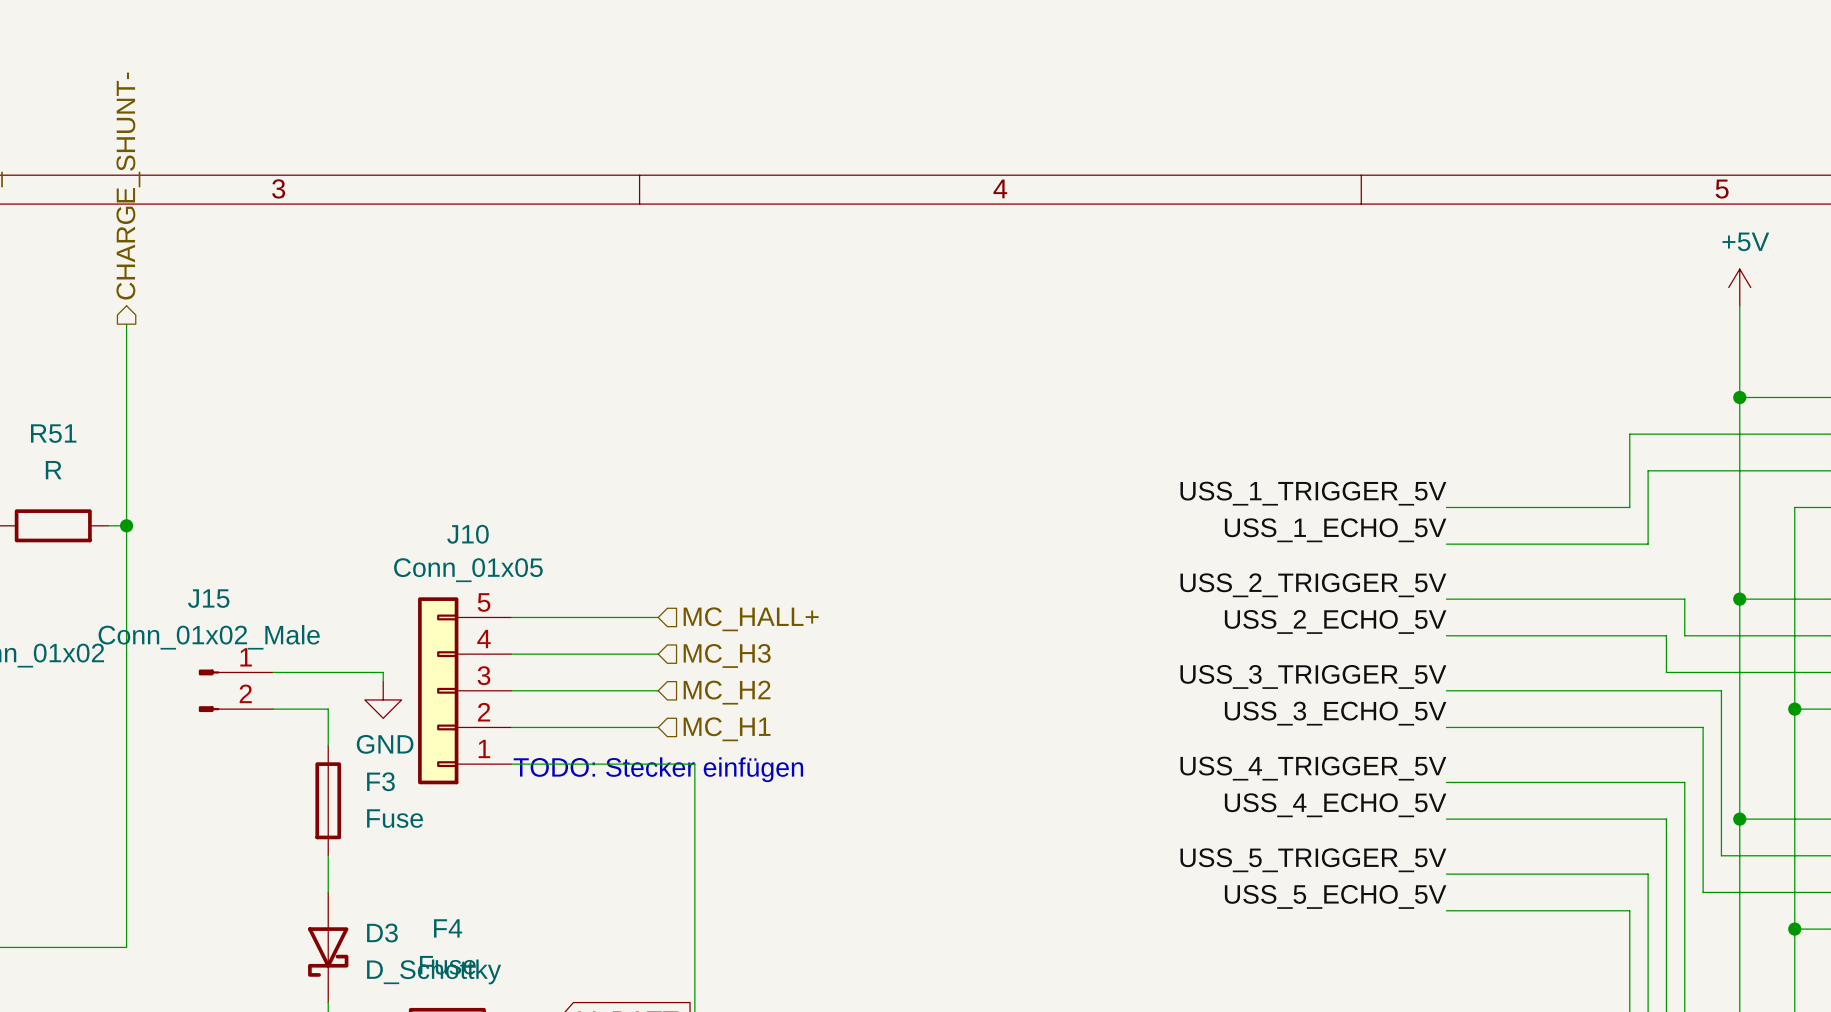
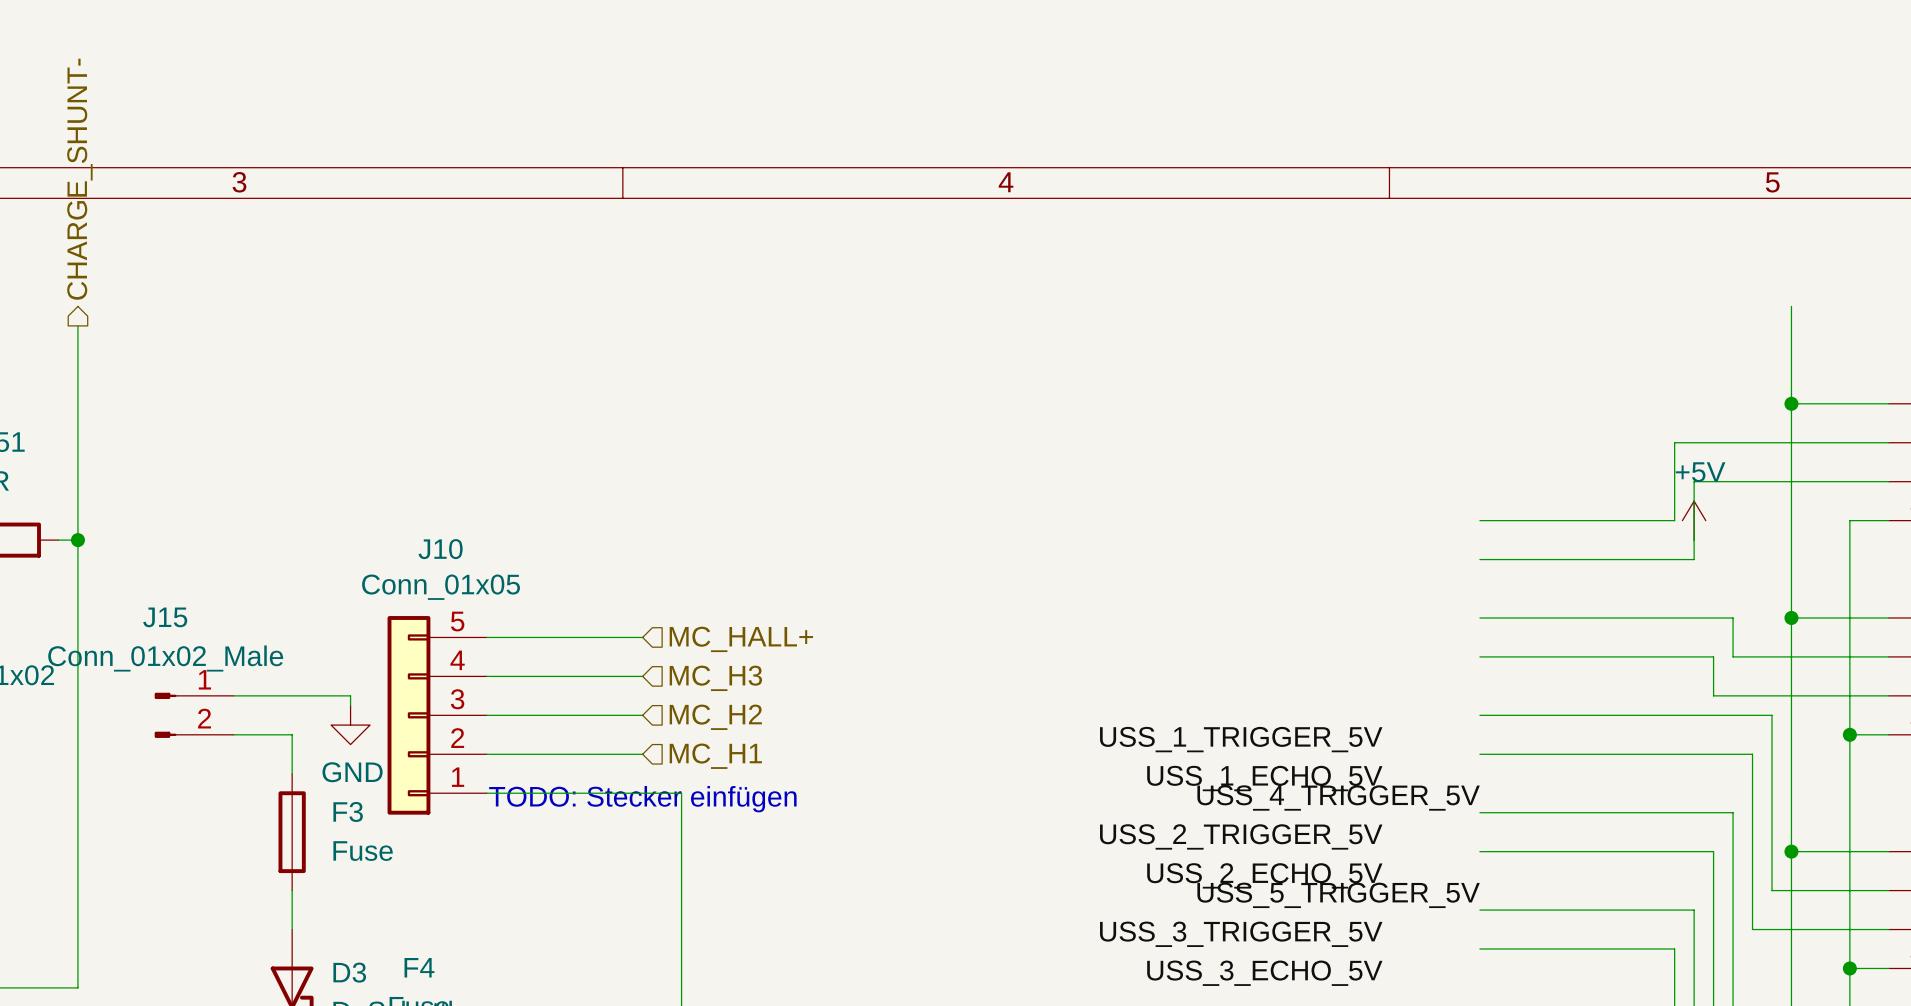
power symbol position: +5V (1739, 287) -> +5V (1694, 520)
label position: USS_1_TRIGGER_5V (1313, 493) -> USS_1_TRIGGER_5V (1241, 739)
label position: USS_1_ECHO_5V (1335, 530) -> USS_1_ECHO_5V (1264, 778)
label position: USS_2_TRIGGER_5V (1313, 585) -> USS_2_TRIGGER_5V (1241, 836)
label position: USS_2_ECHO_5V (1335, 621) -> USS_2_ECHO_5V (1264, 875)
label position: USS_3_TRIGGER_5V (1313, 676) -> USS_3_TRIGGER_5V (1241, 934)
label position: USS_3_ECHO_5V (1335, 713) -> USS_3_ECHO_5V (1264, 973)
label: USS_4_ECHO_5V (1335, 805) -> none
label: USS_5_ECHO_5V (1335, 896) -> none

